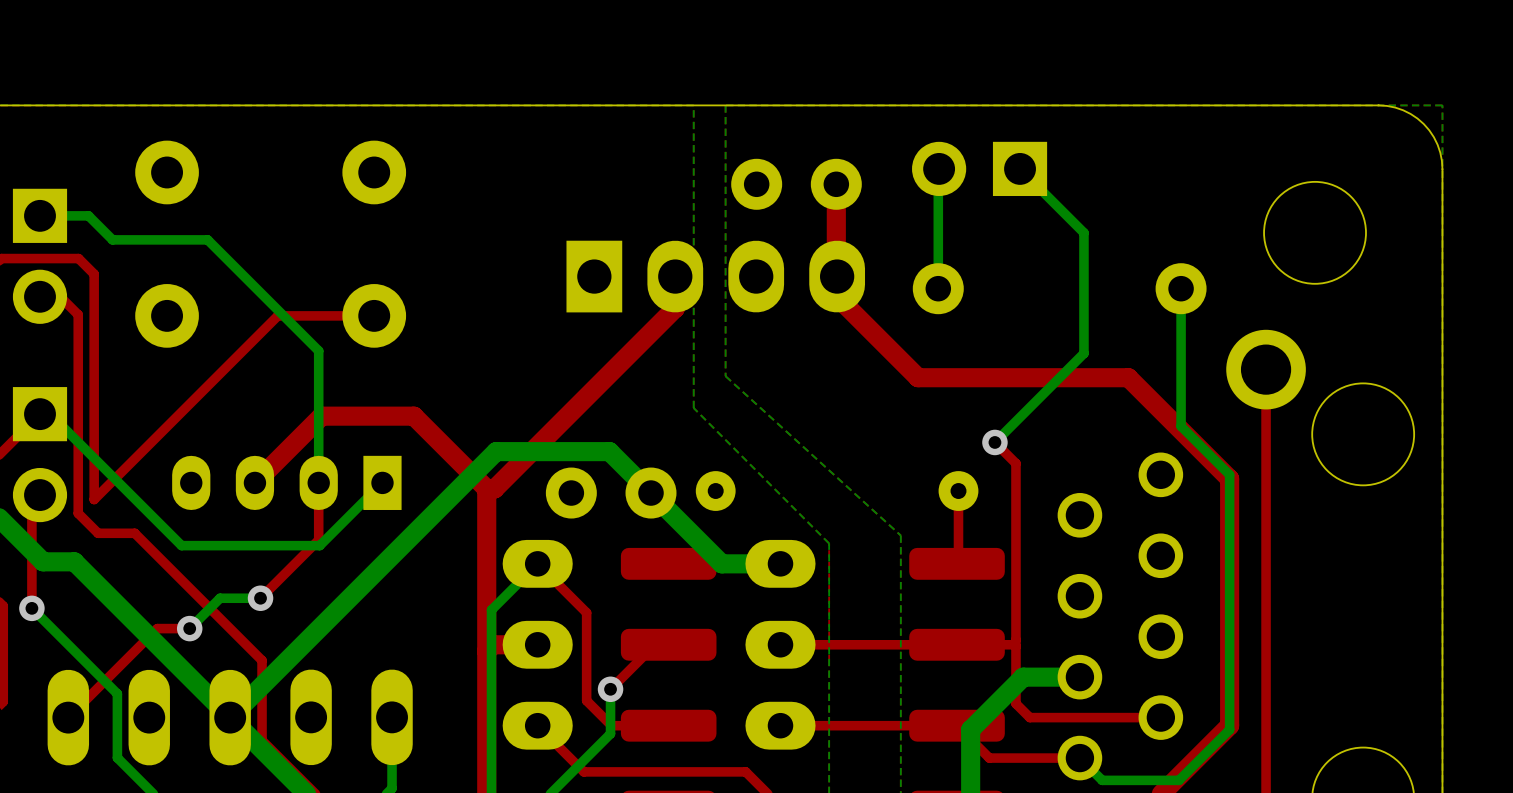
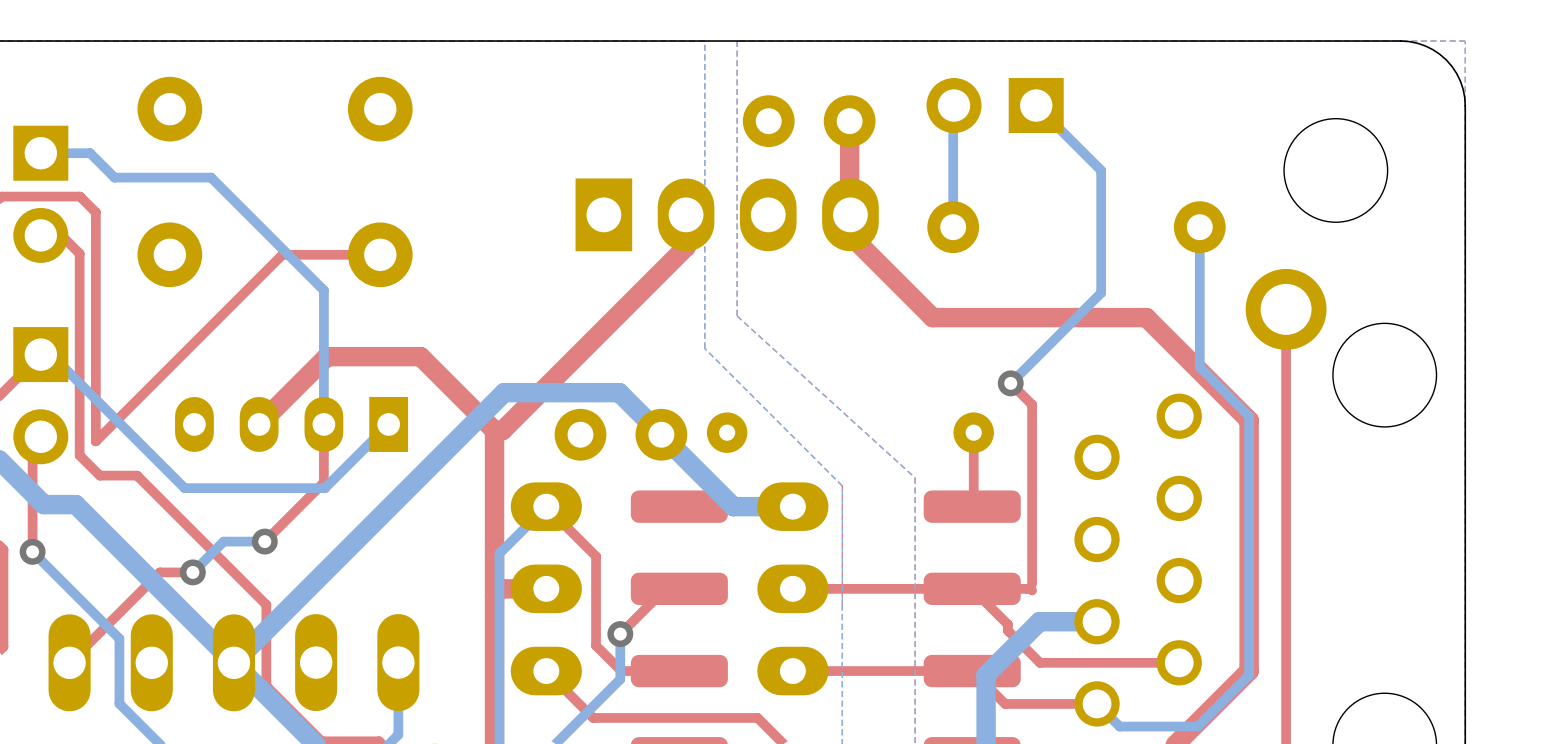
top track: (1015, 639) (1015, 703) (1029, 717) -> (972, 588) (1007, 624) (1007, 630) (1040, 662) (1046, 662)

